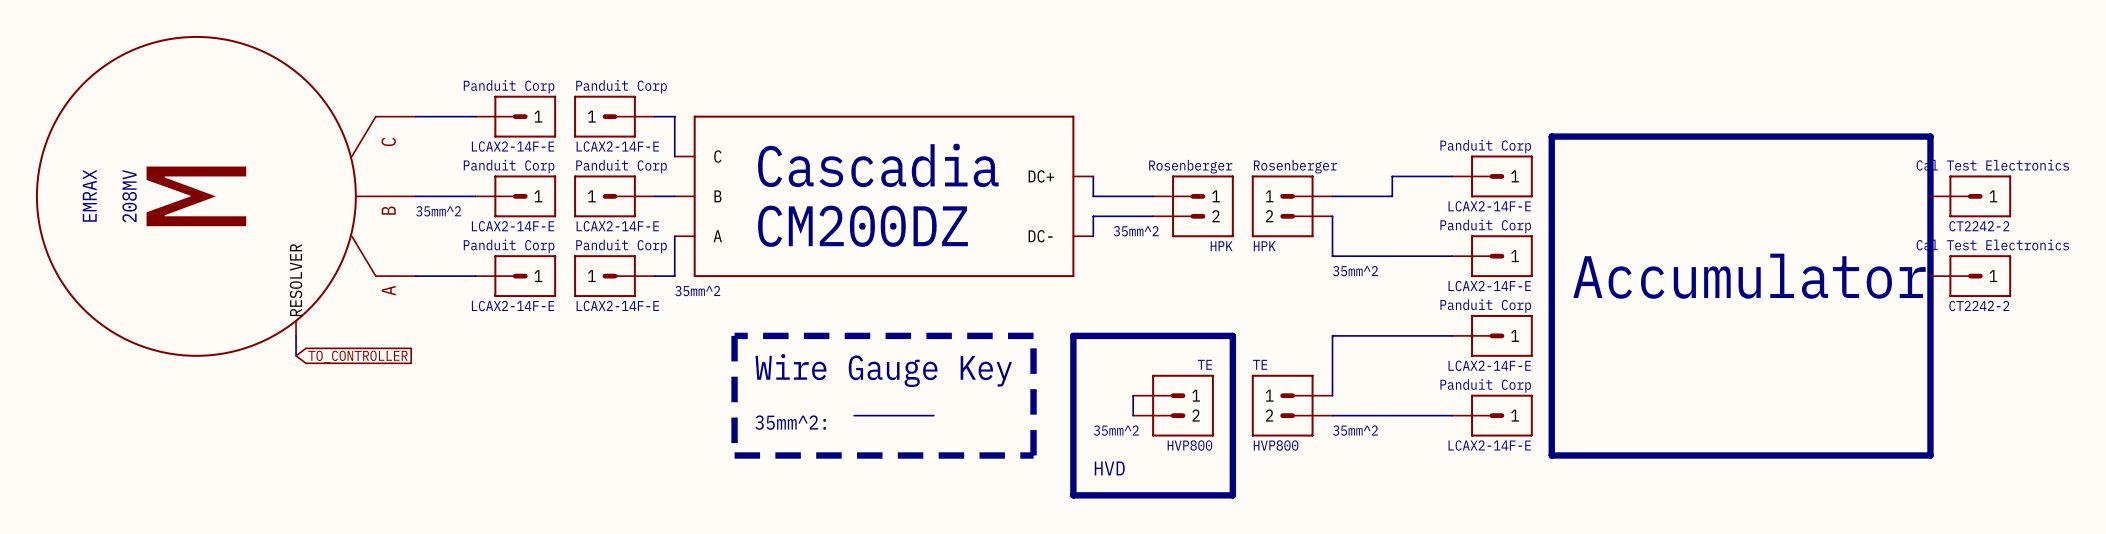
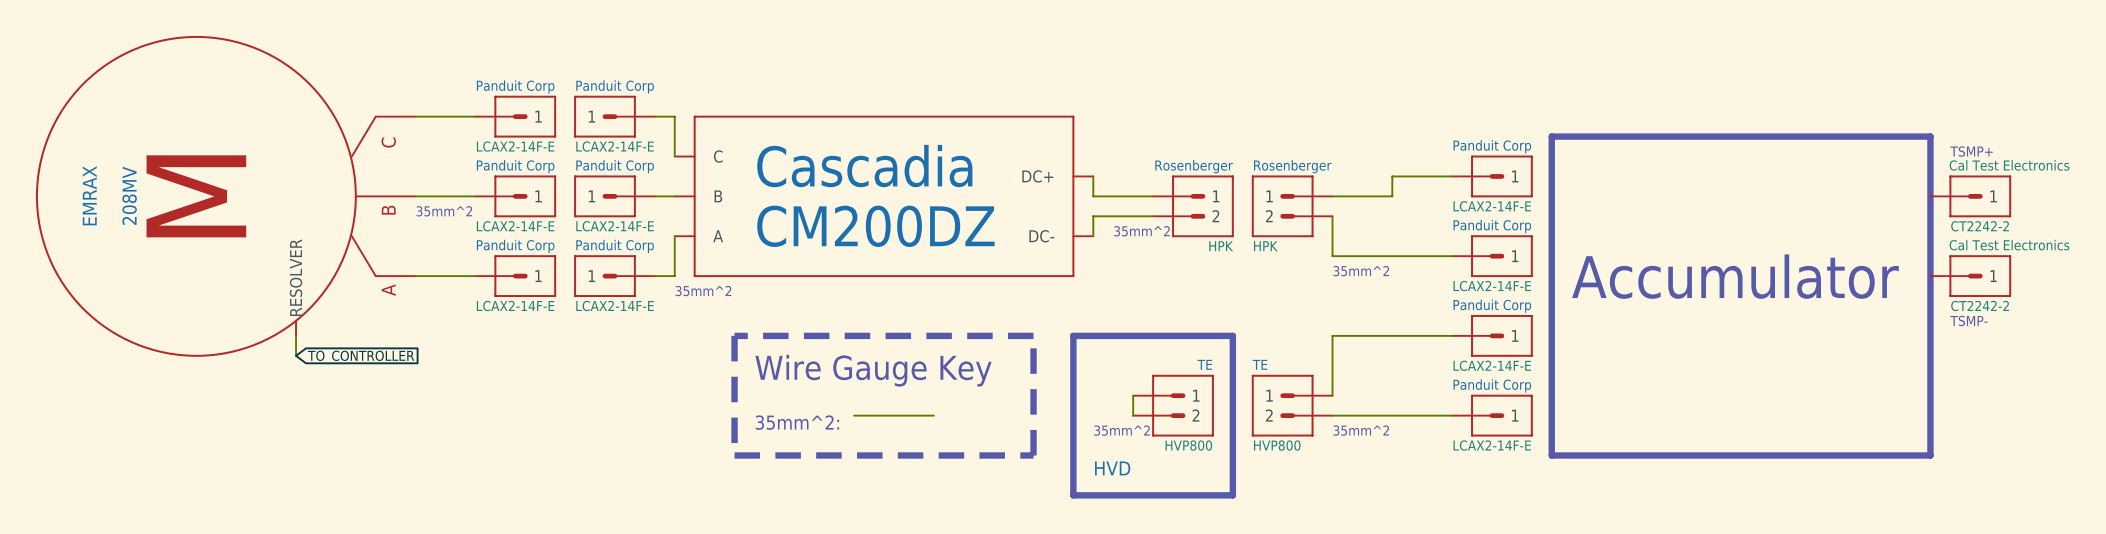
text: none -> TSMP+ (1971, 151)
text: none -> TSMP- (1968, 320)

